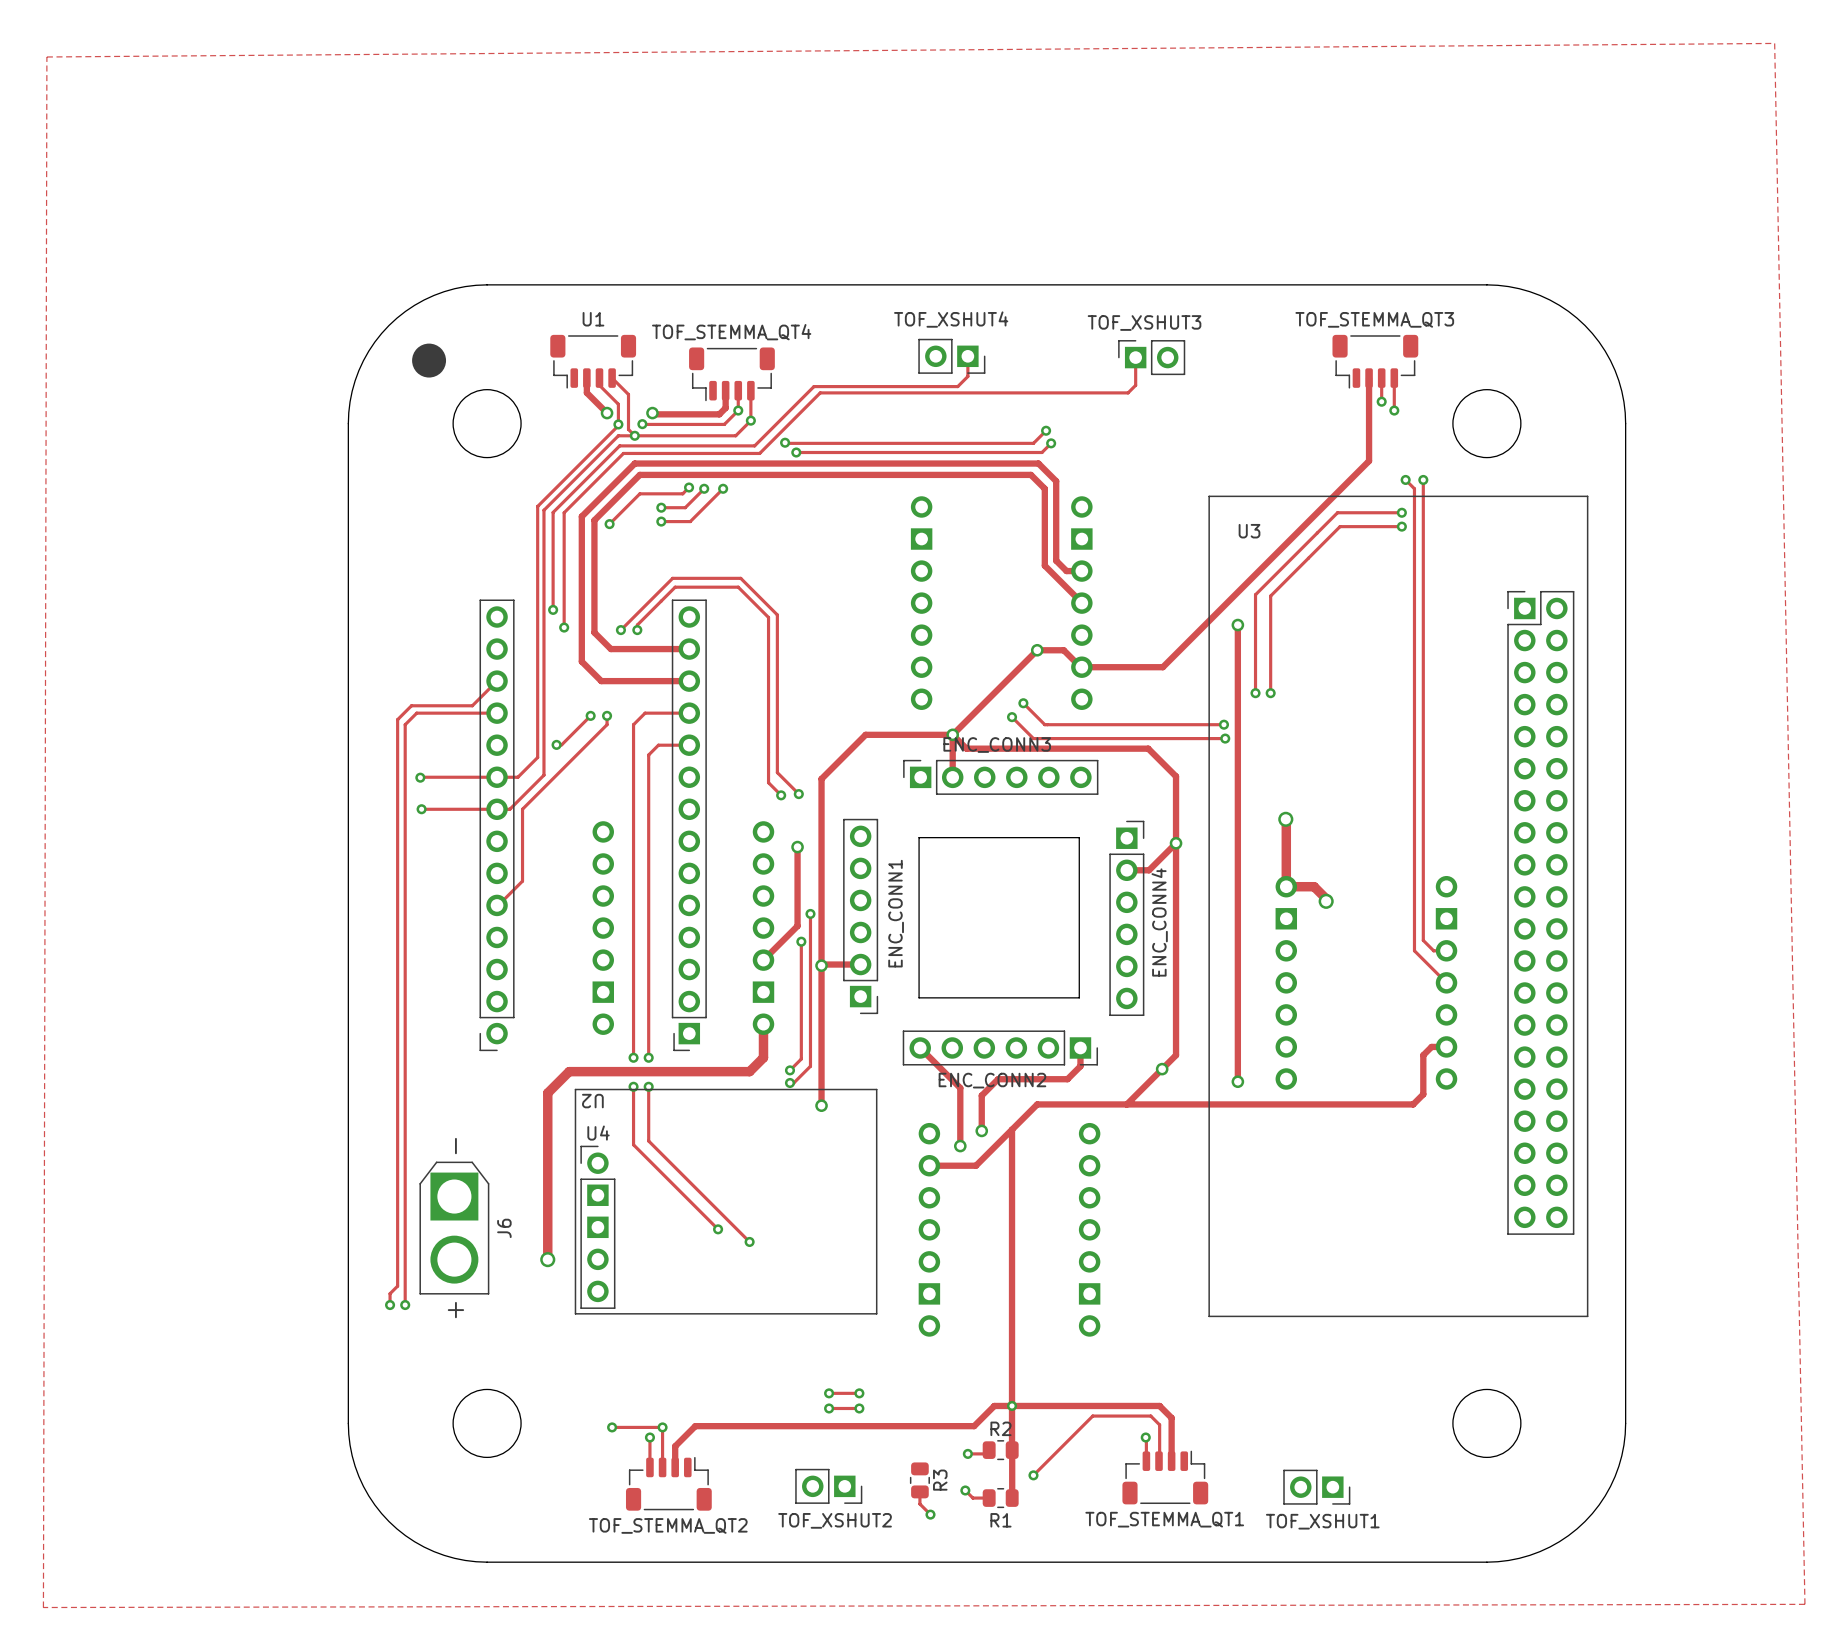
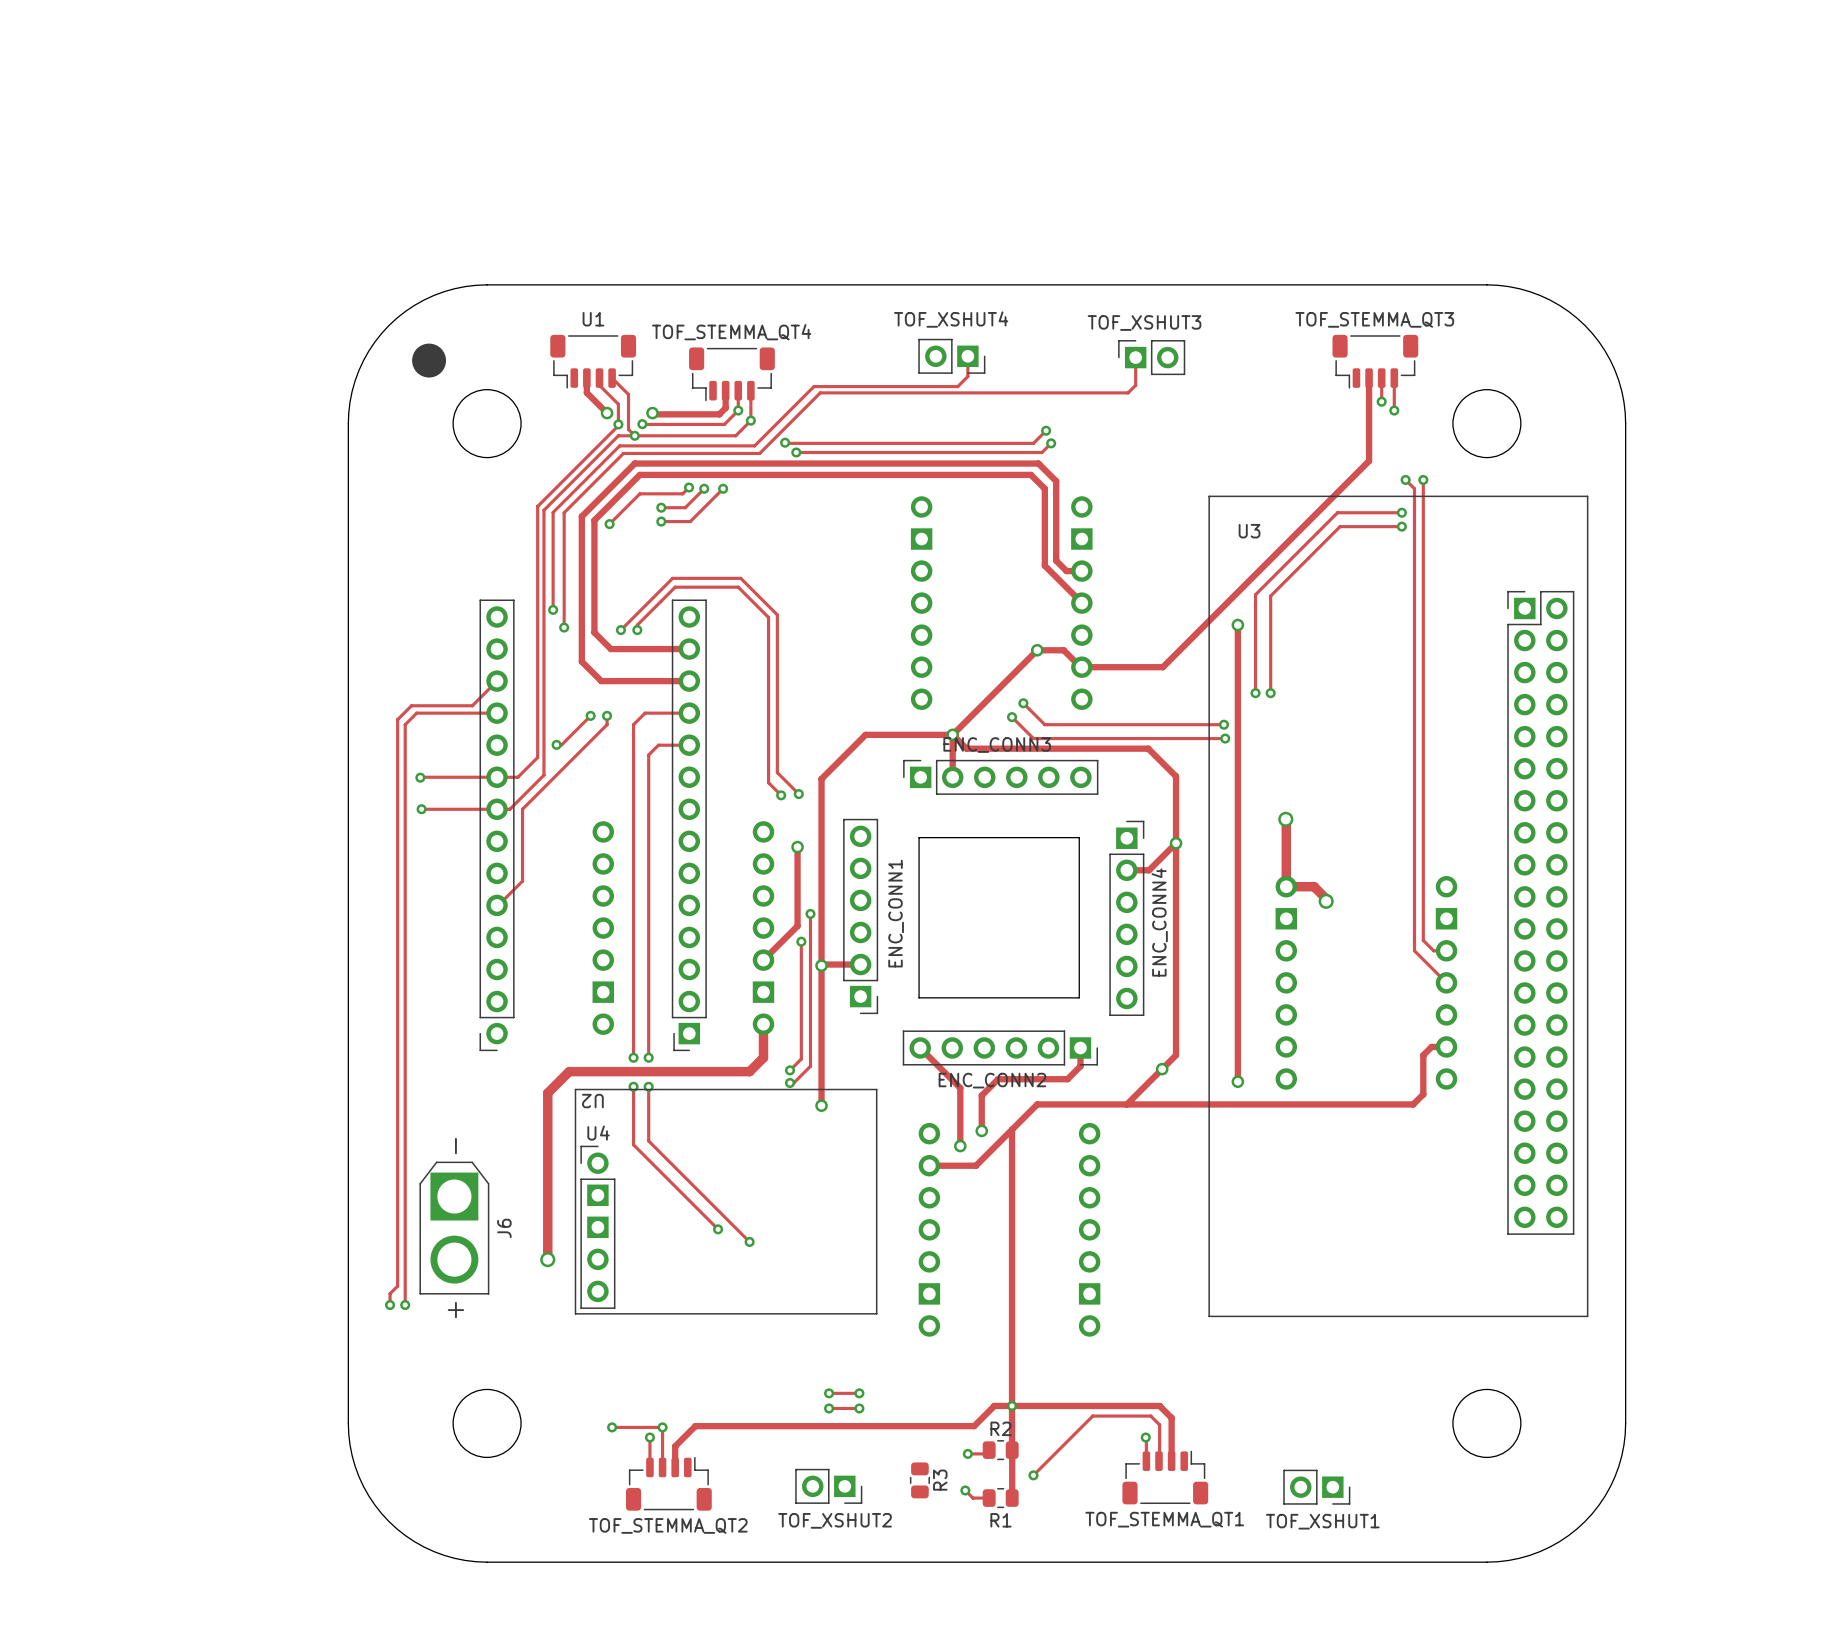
zone outline: (1774, 43) (46, 56) (43, 1607) (1804, 1604) (1774, 43) -> none
track: (919, 1491) (919, 1504) (931, 1515) -> none
via: (930, 1514) -> none

